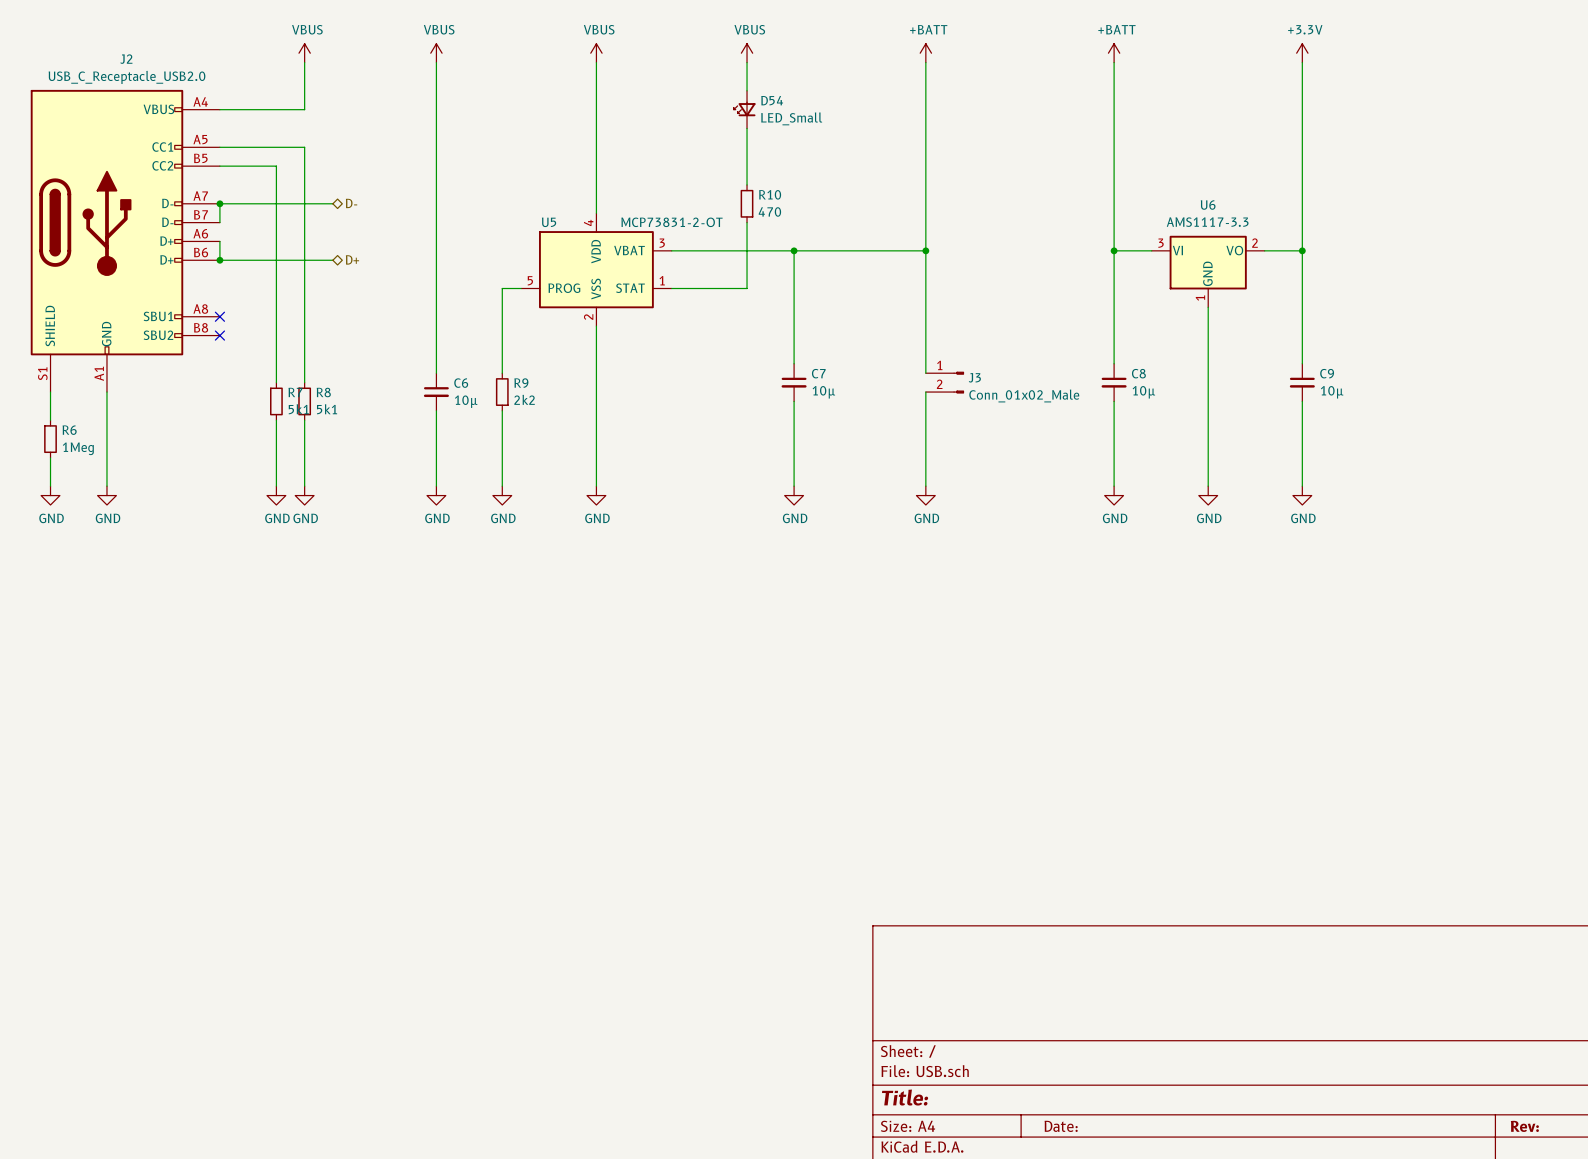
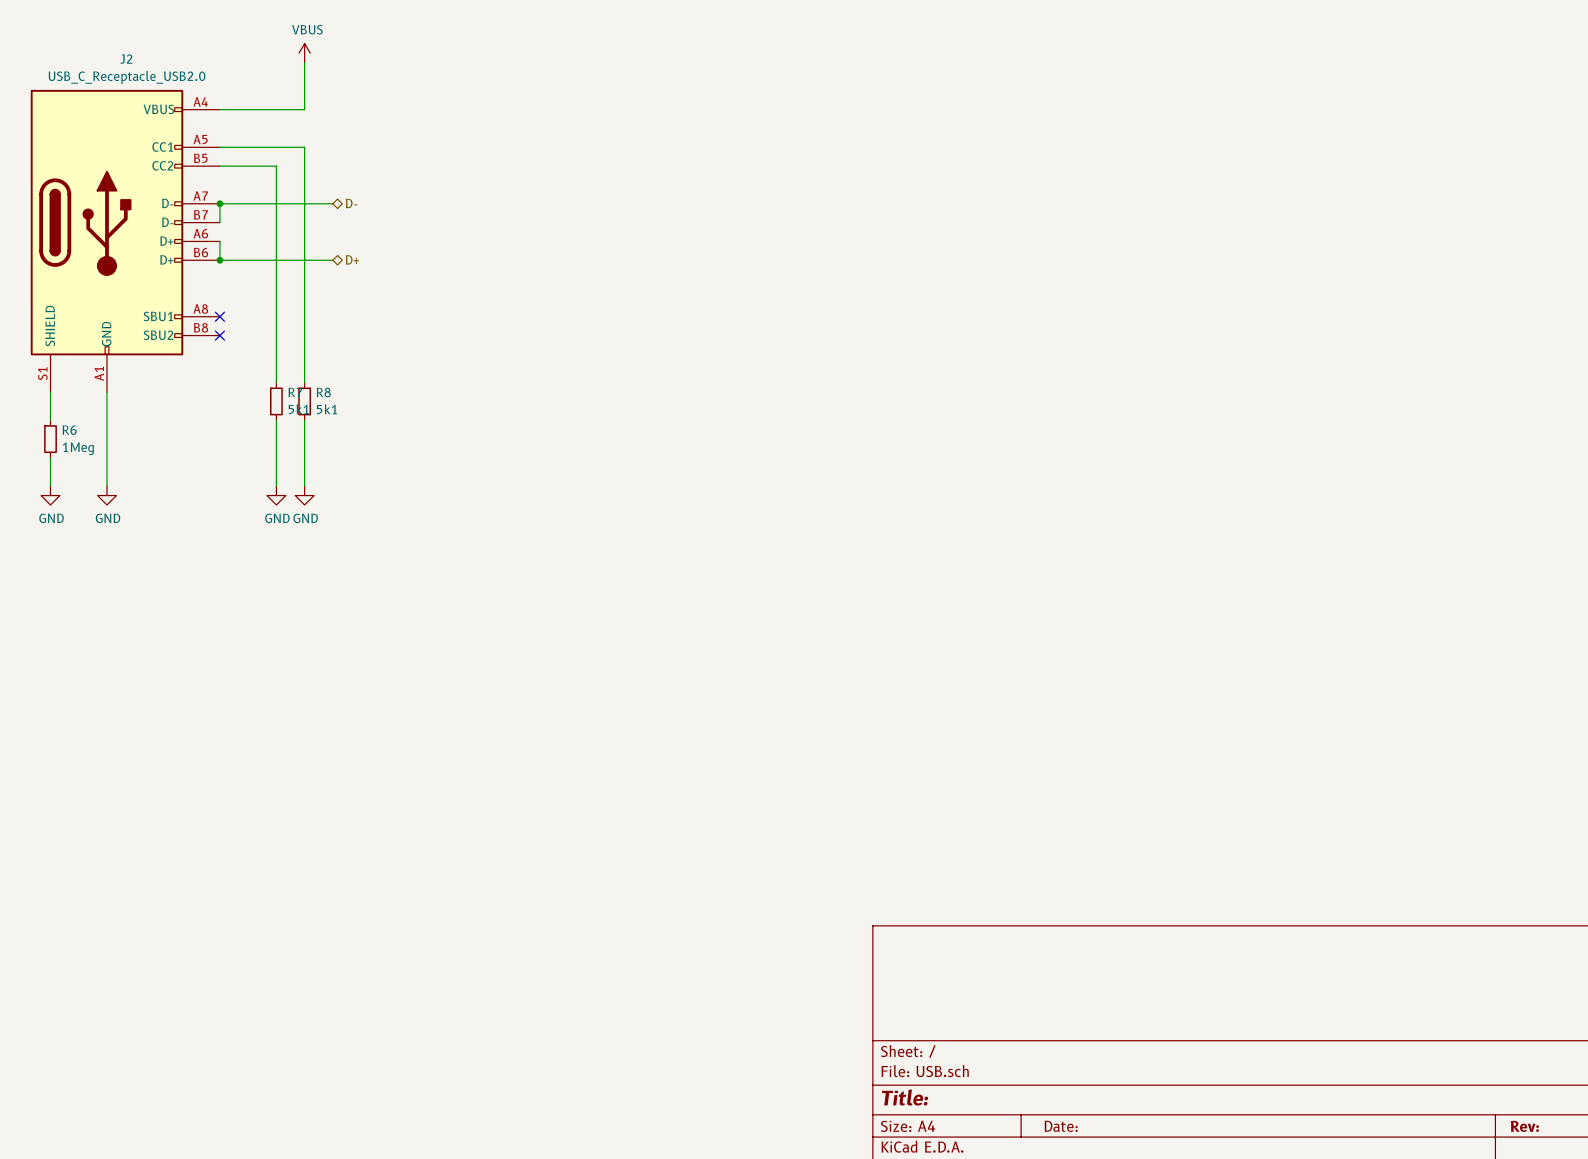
power symbol: VBUS (436, 53) -> none
power symbol: VBUS (596, 53) -> none
power symbol: VBUS (747, 53) -> none
power symbol: +BATT (925, 53) -> none
power symbol: +BATT (1114, 53) -> none
power symbol: +3.3V (1302, 53) -> none
wire: (436, 62) (436, 373) -> none
wire: (596, 62) (596, 213) -> none
wire: (747, 62) (747, 90) -> none
wire: (925, 62) (925, 373) -> none
wire: (1114, 62) (1114, 363) -> none
wire: (1302, 62) (1302, 363) -> none
D54: LED_Small (744, 109) -> none
wire: (747, 128) (747, 184) -> none
R10: 470 (747, 203) -> none
wire: (747, 222) (747, 288) (671, 288) -> none
wire: (671, 250) (925, 250) -> none
wire: (794, 250) (794, 363) -> none
junction: (794, 250) -> none
junction: (925, 250) -> none
wire: (1114, 250) (1151, 250) -> none
junction: (1114, 250) -> none
wire: (1264, 250) (1302, 250) -> none
junction: (1302, 250) -> none
U5: MCP73831-2-OT (596, 269) -> none
U6: AMS1117-3.3 (1208, 271) -> none
wire: (521, 288) (502, 288) (502, 373) -> none
wire: (1208, 307) (1208, 486) -> none
wire: (596, 326) (596, 486) -> none
C7: 10µ (794, 382) -> none
J3: Conn_01x02_Male (944, 382) -> none
C8: 10µ (1114, 382) -> none
C9: 10µ (1302, 382) -> none
C6: 10µ (436, 392) -> none
R9: 2k2 (502, 392) -> none
wire: (925, 392) (925, 486) -> none
wire: (794, 401) (794, 486) -> none
wire: (1114, 401) (1114, 486) -> none
wire: (1302, 401) (1302, 486) -> none
wire: (436, 410) (436, 486) -> none
wire: (502, 410) (502, 486) -> none
power symbol: GND (436, 495) -> none
power symbol: GND (502, 495) -> none
power symbol: GND (596, 495) -> none
power symbol: GND (794, 495) -> none
power symbol: GND (925, 495) -> none
power symbol: GND (1114, 495) -> none
power symbol: GND (1208, 495) -> none
power symbol: GND (1302, 495) -> none

